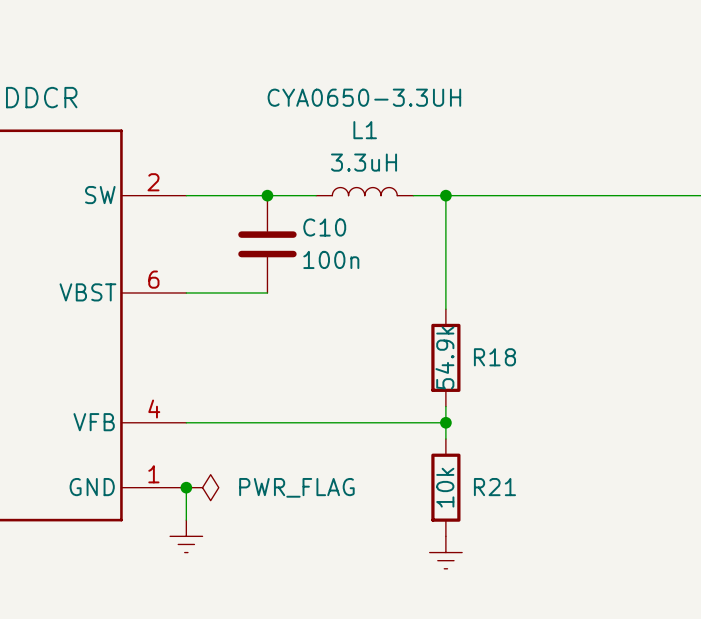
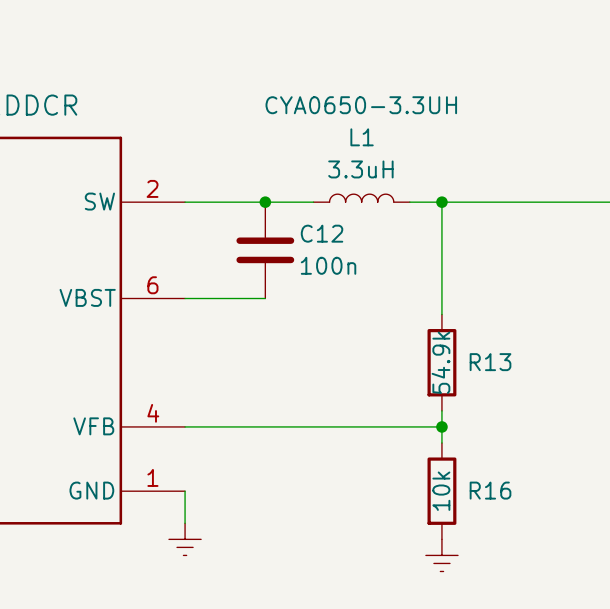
C10 name: C10 (324, 227) -> C12 (322, 233)
R18 name: R18 (494, 357) -> R13 (490, 362)
junction: (186, 487) -> none
power symbol: PWR_FLAG (202, 487) -> none
R21 name: R21 (494, 487) -> R16 (490, 490)

